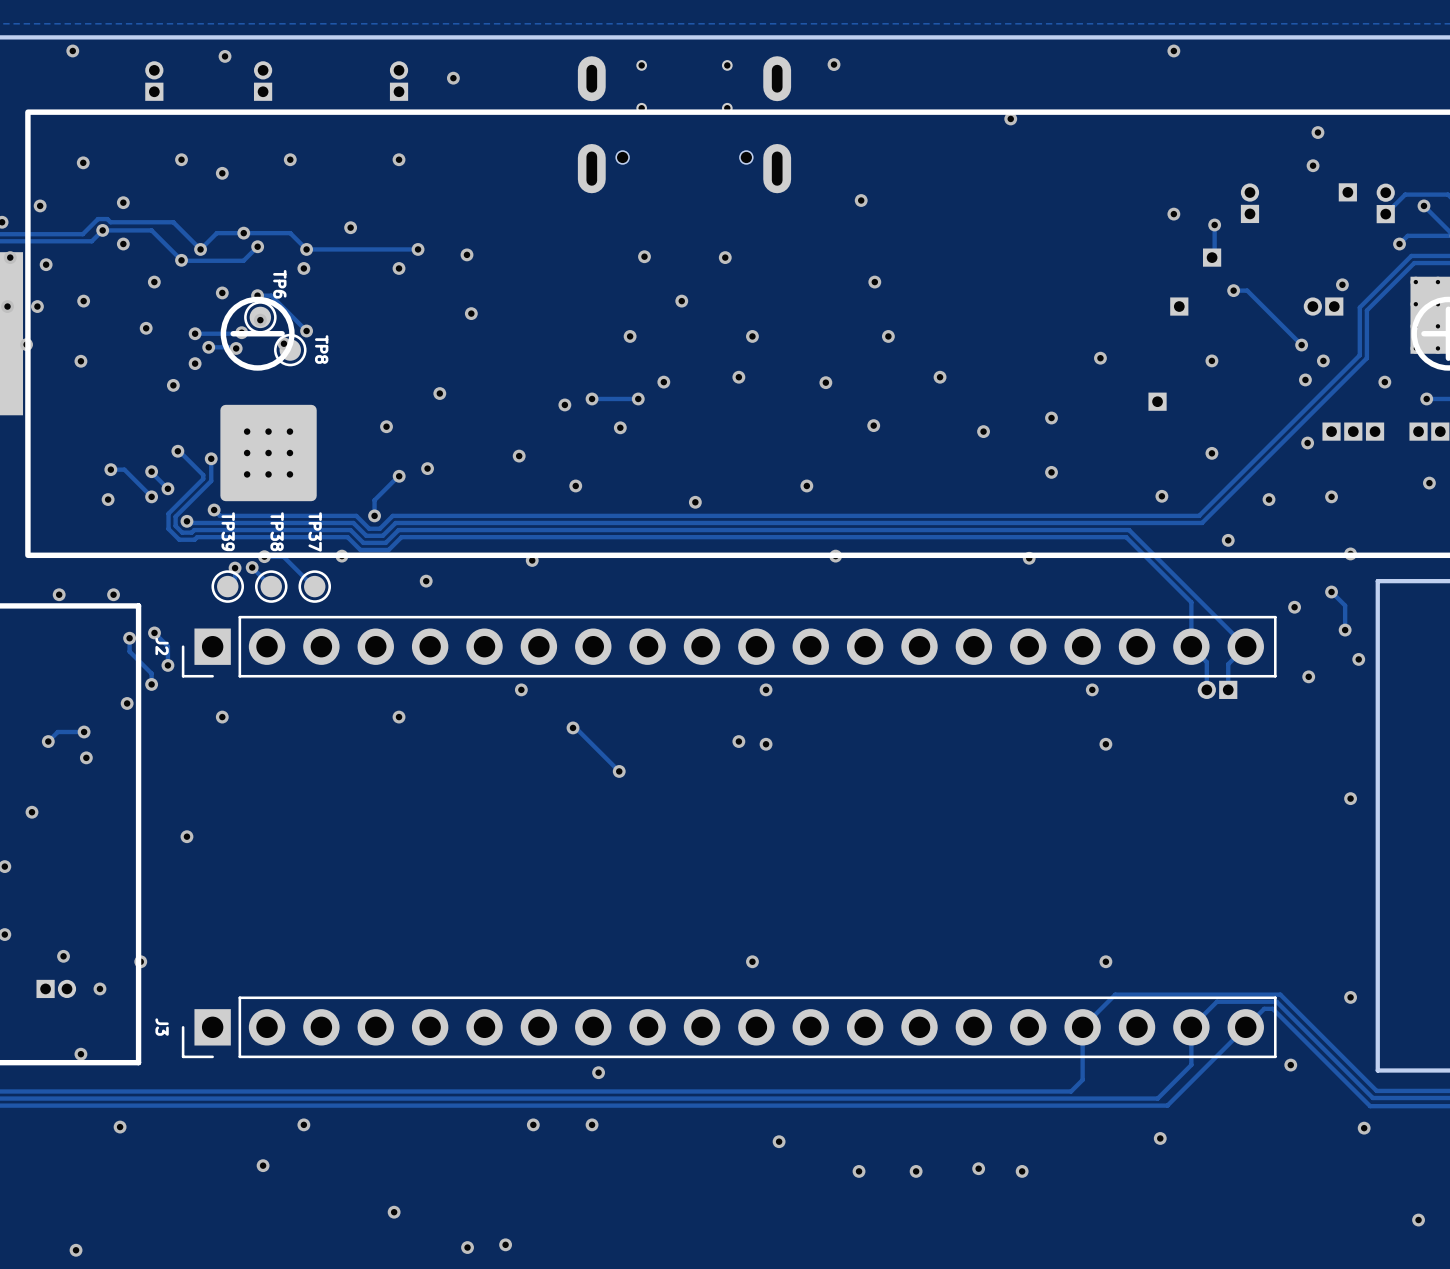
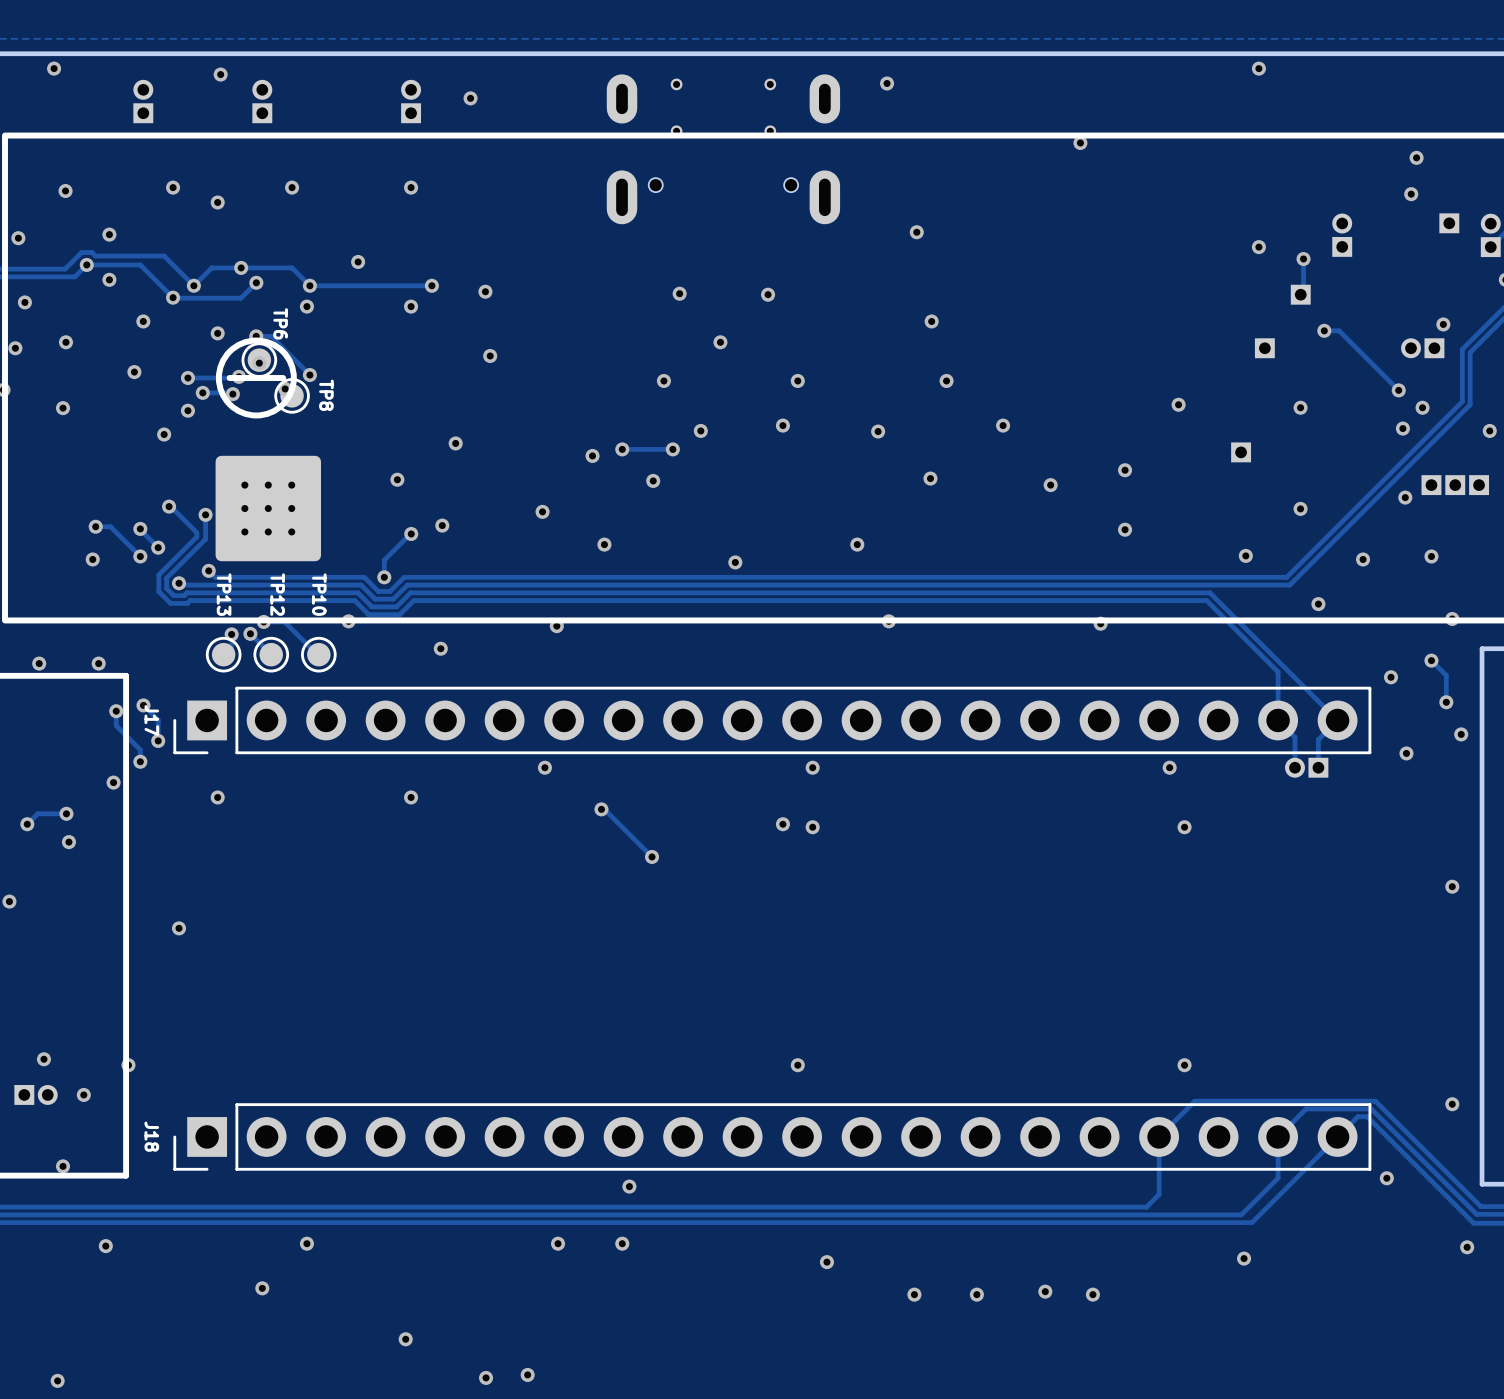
TP39 name: TP39 (228, 531) -> TP13 (224, 594)
TP38 name: TP38 (277, 531) -> TP12 (277, 594)
TP37 name: TP37 (315, 531) -> TP10 (319, 594)
J2 name: J2 (162, 646) -> J17 (151, 720)
J3 name: J3 (162, 1027) -> J18 (151, 1136)

